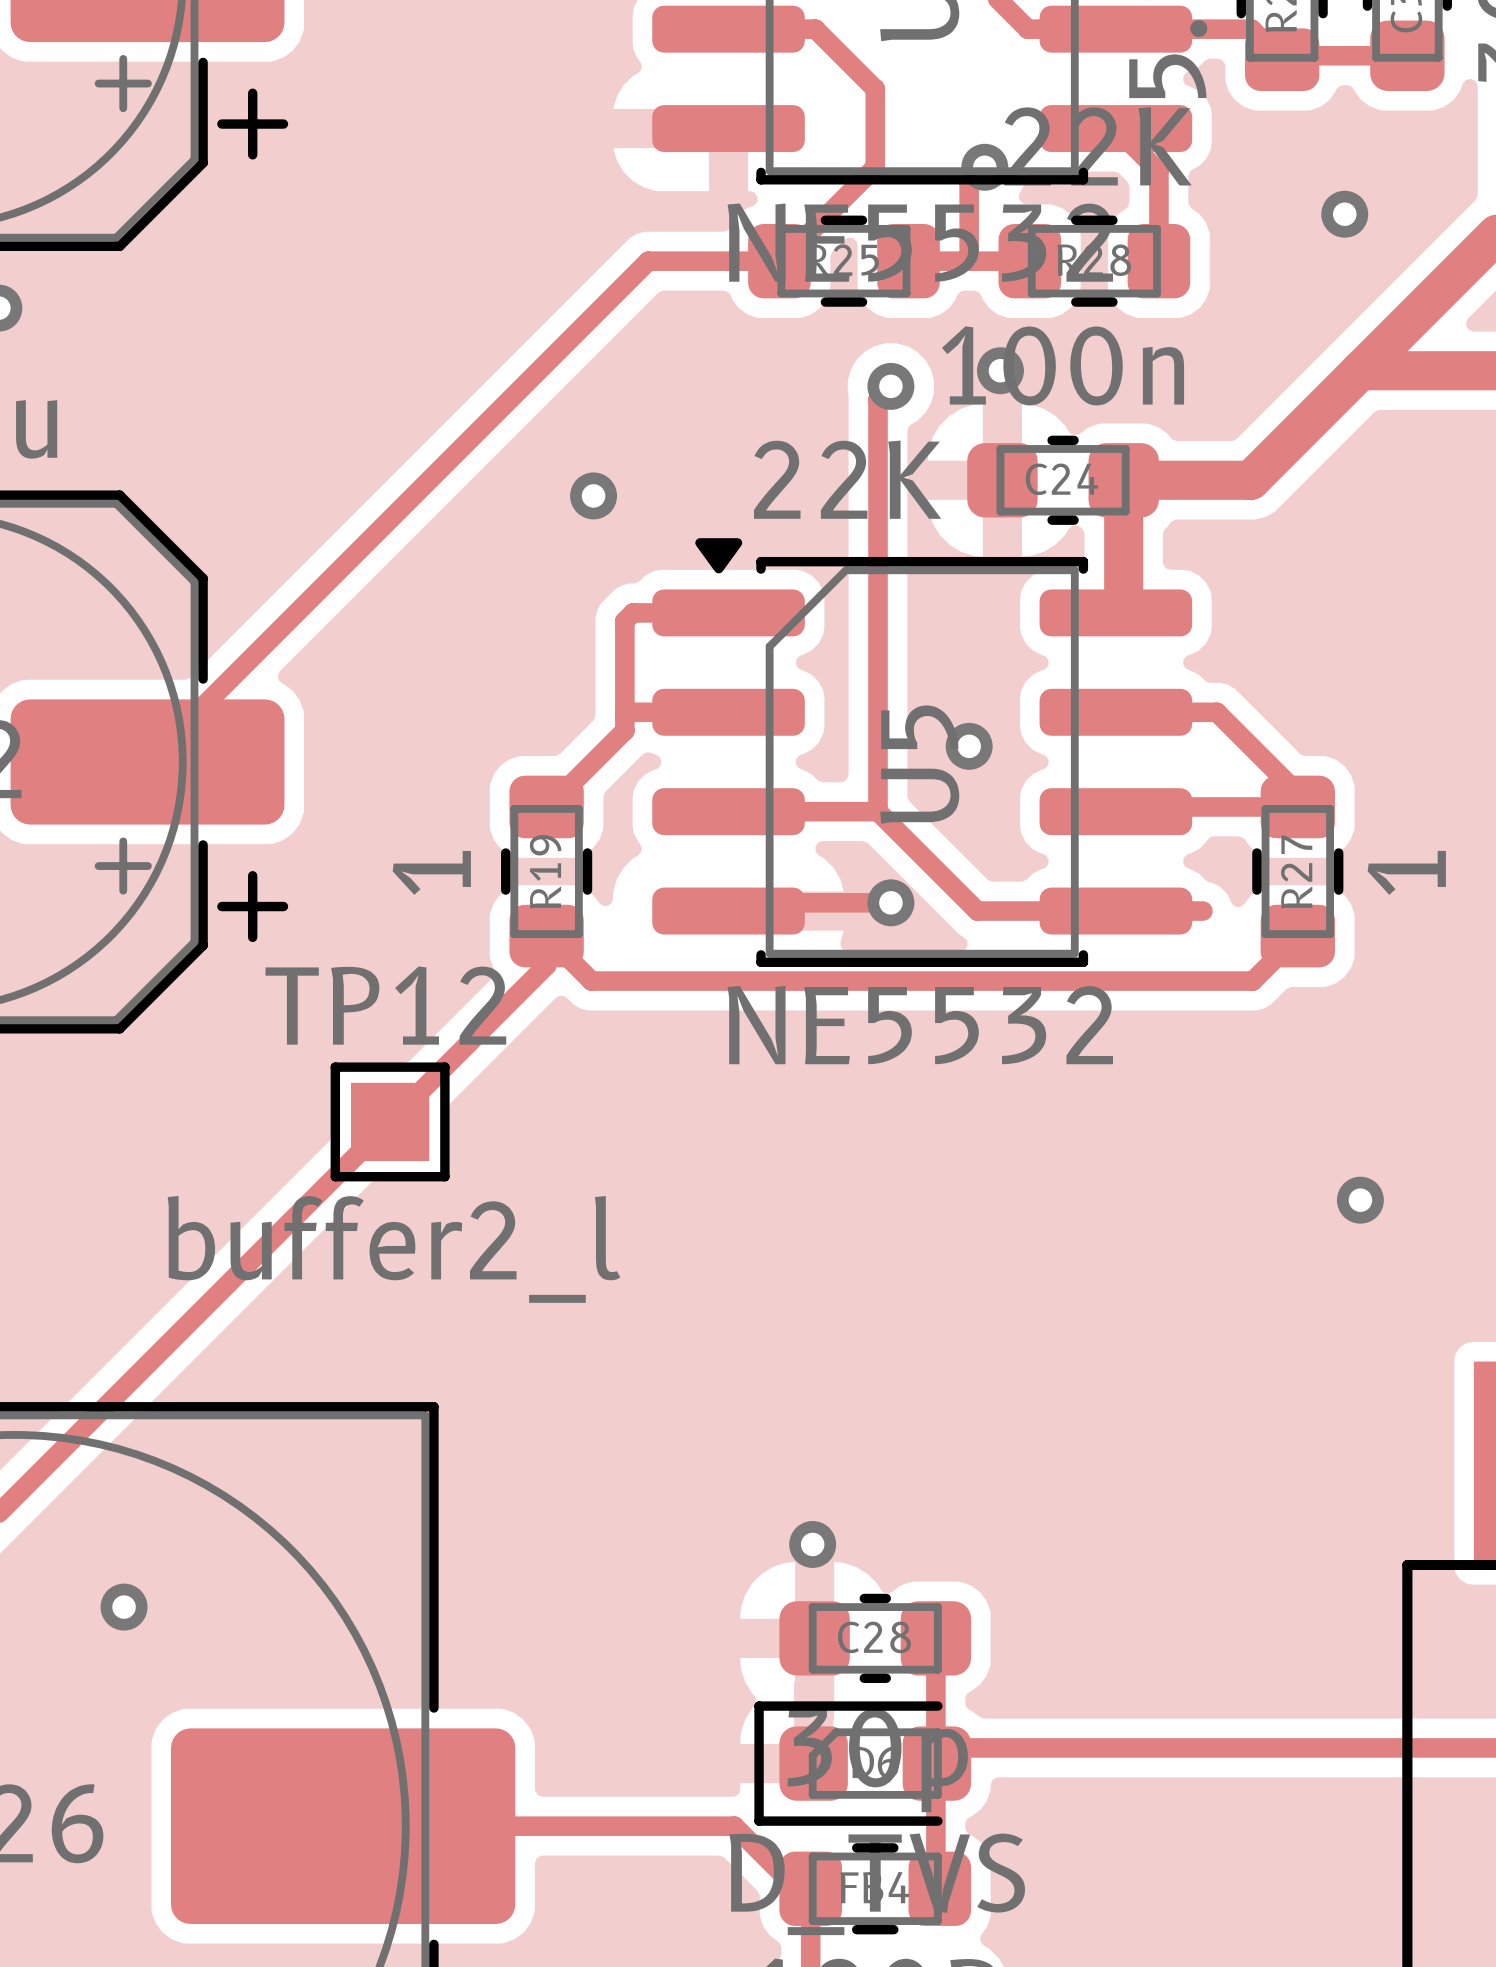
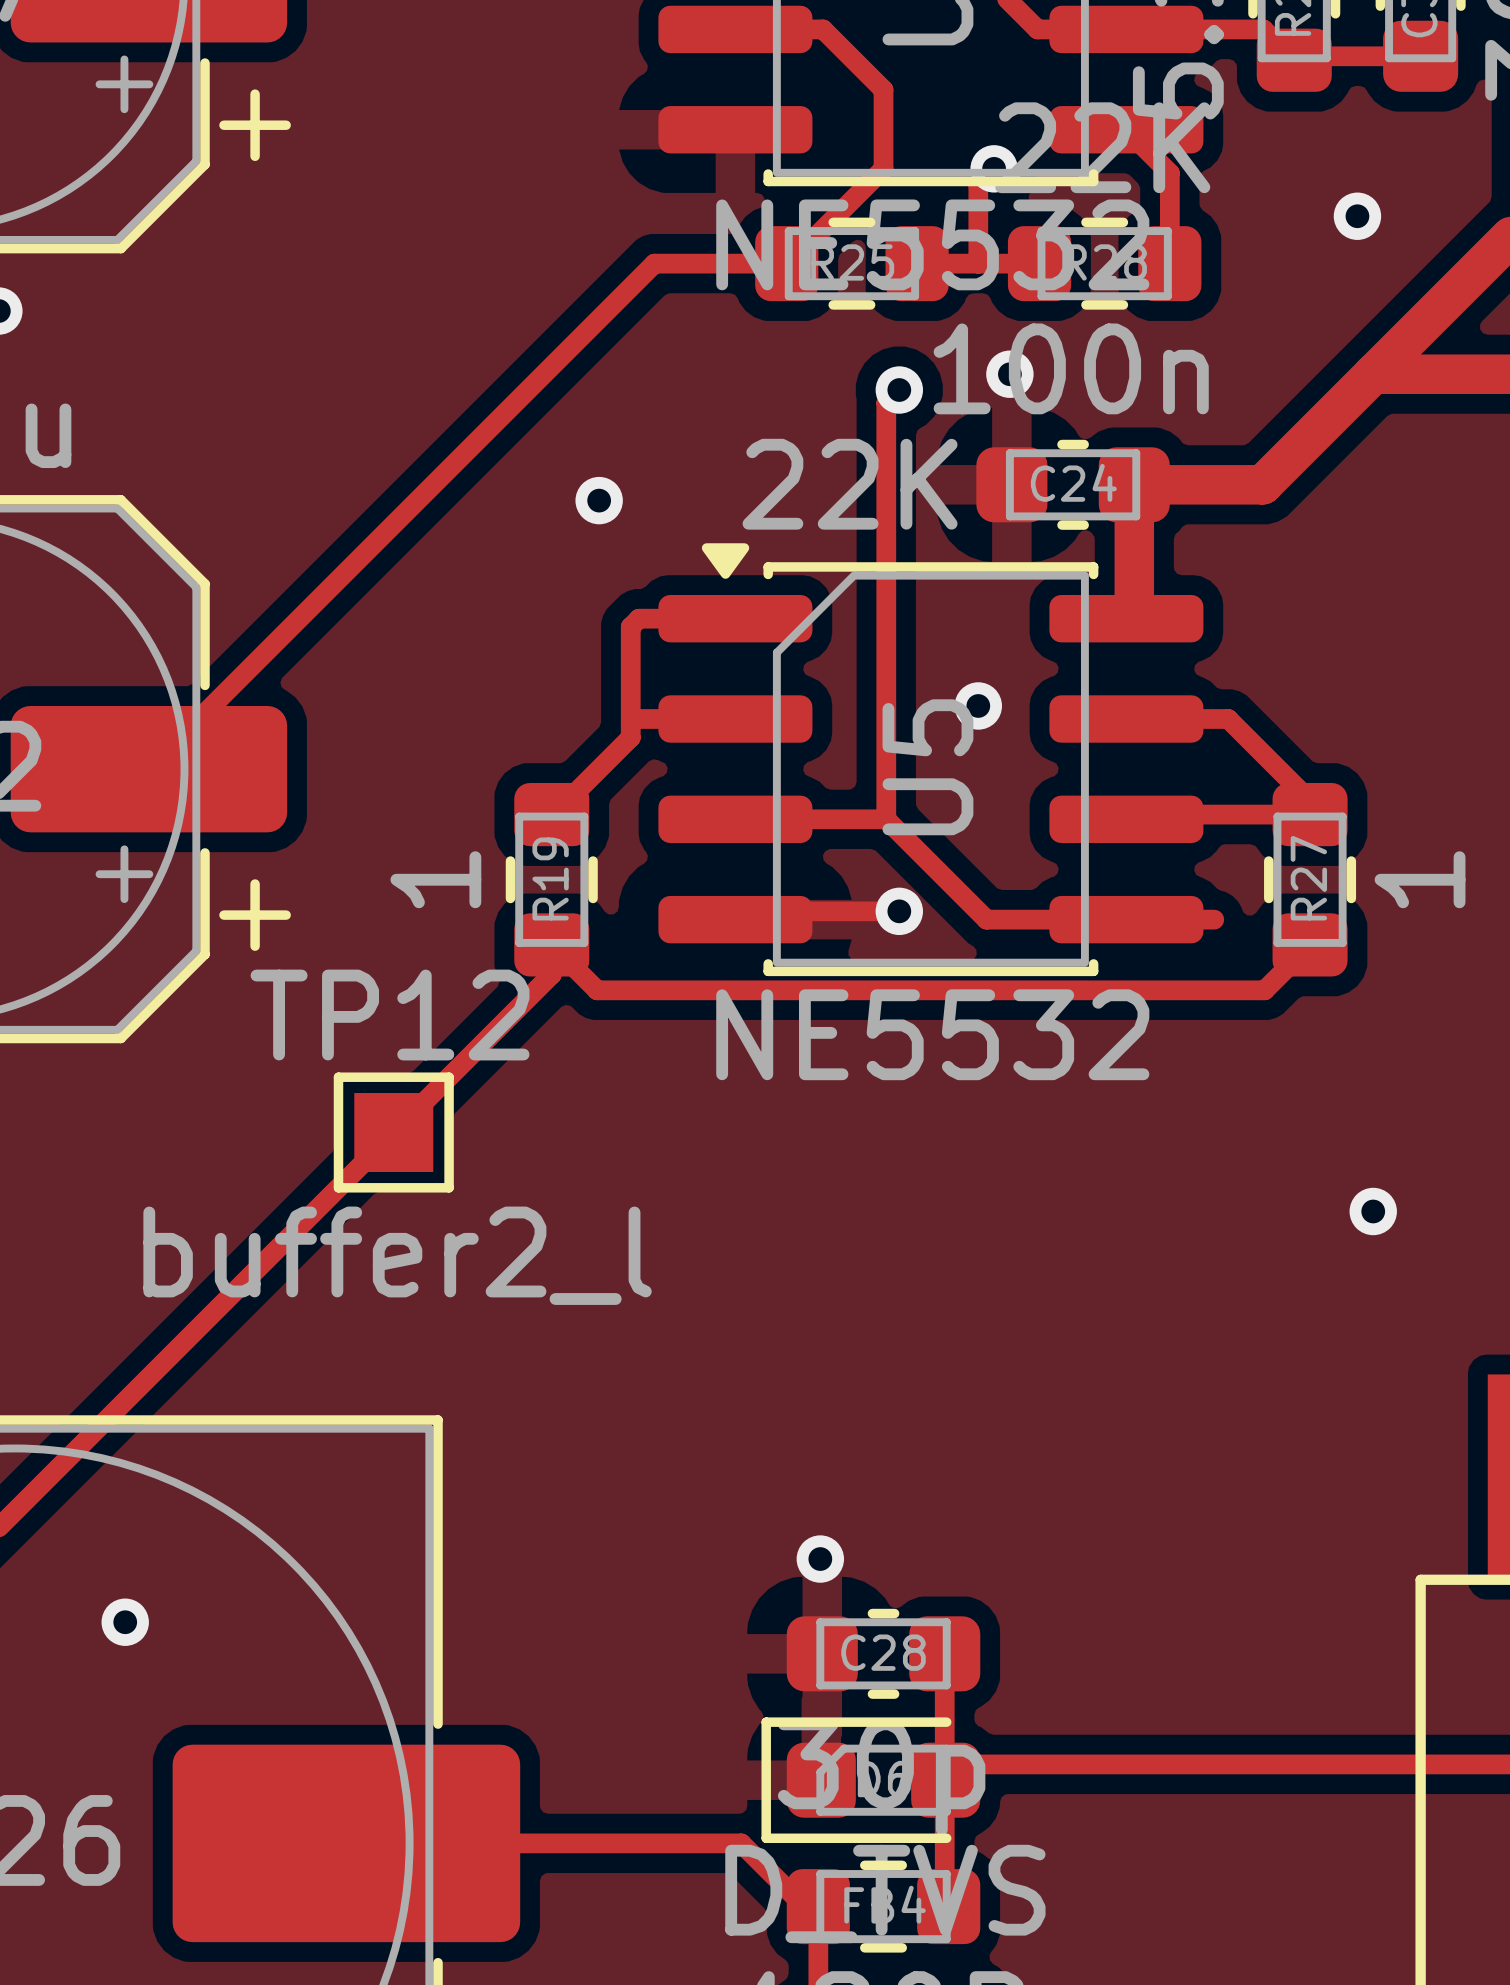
via position: (969, 746) -> (978, 705)

